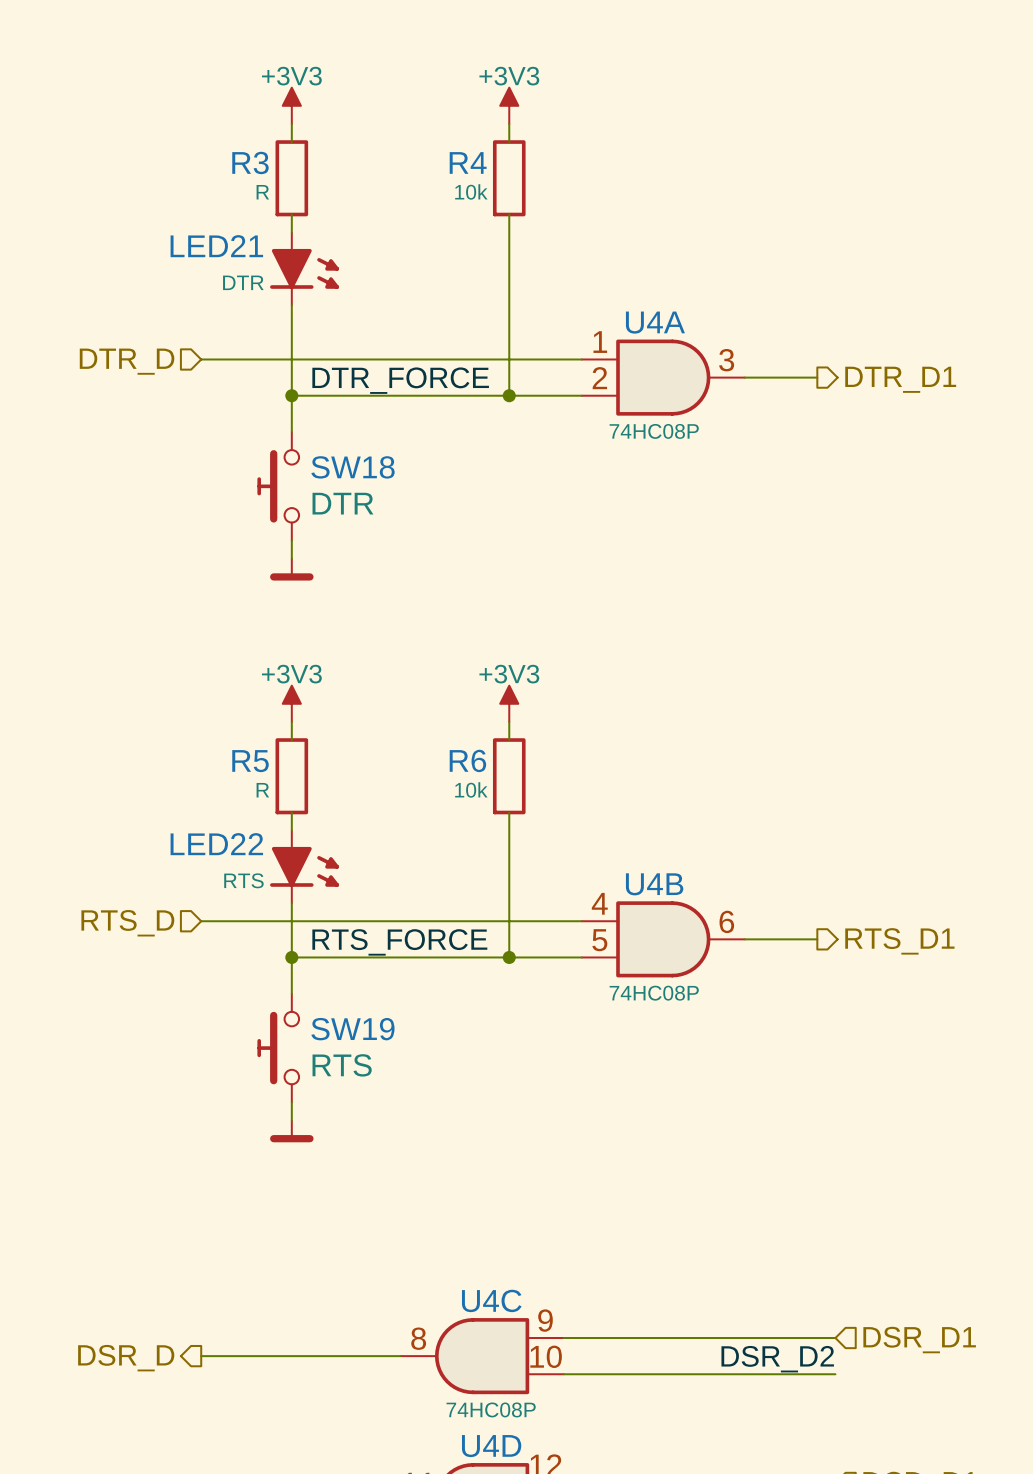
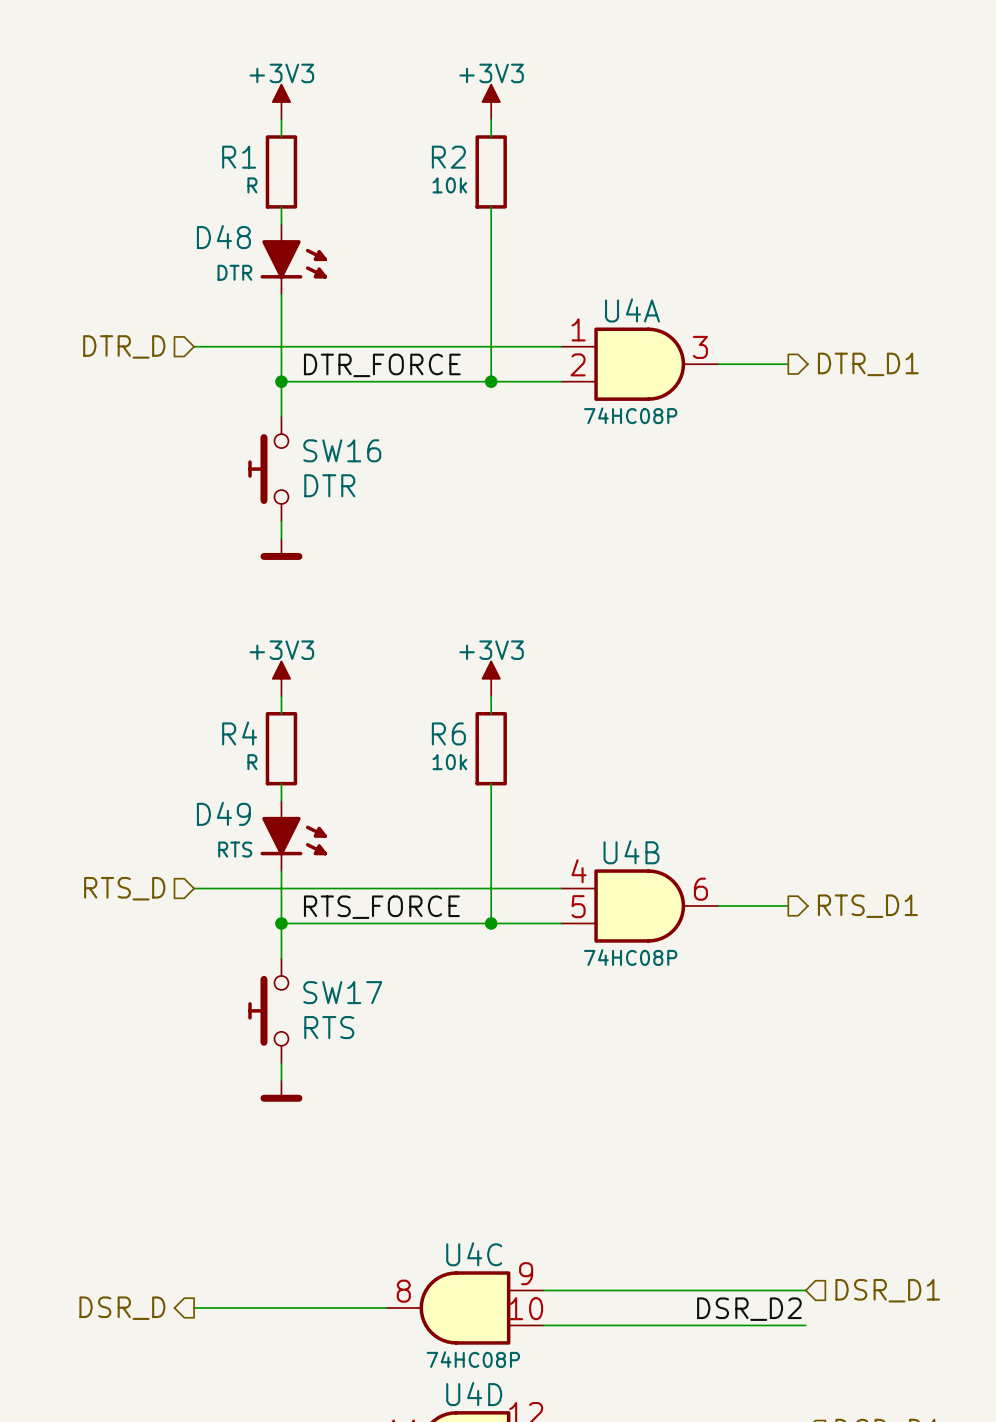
R3 name: R3 (250, 162) -> R1 (239, 157)
R4 name: R4 (468, 162) -> R2 (448, 157)
LED21 name: LED21 (216, 246) -> D48 (223, 237)
SW18 name: SW18 (353, 467) -> SW16 (342, 450)
R5 name: R5 (250, 761) -> R4 (239, 733)
LED22 name: LED22 (216, 844) -> D49 (223, 813)
SW19 name: SW19 (352, 1029) -> SW17 (342, 992)

